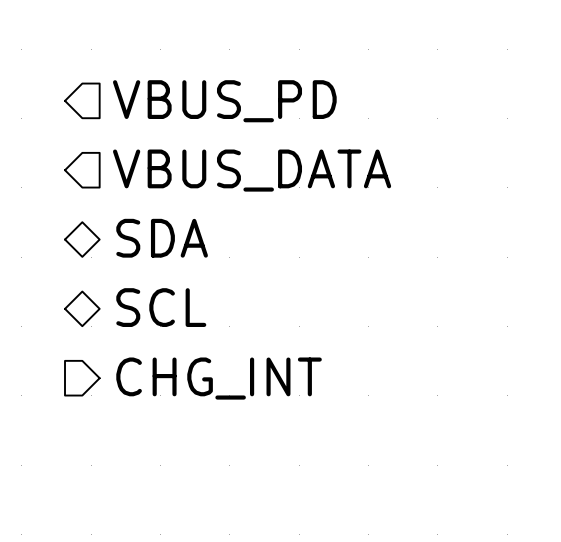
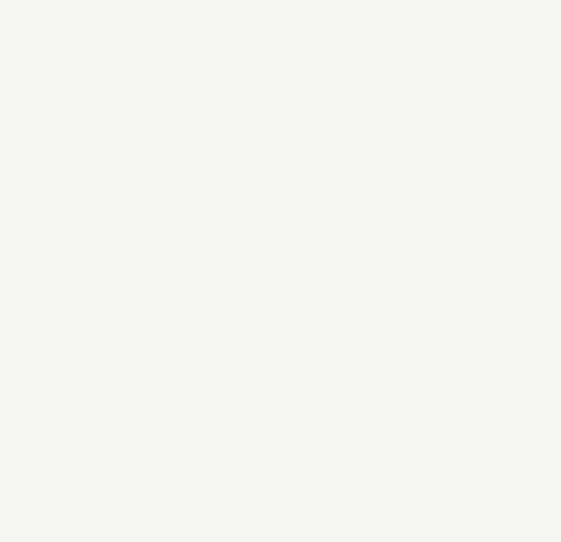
hierarchical label: VBUS_PD (224, 101) -> none
hierarchical label: VBUS_DATA (252, 170) -> none
hierarchical label: SDA (162, 238) -> none
hierarchical label: SCL (161, 307) -> none
hierarchical label: CHG_INT (219, 378) -> none

